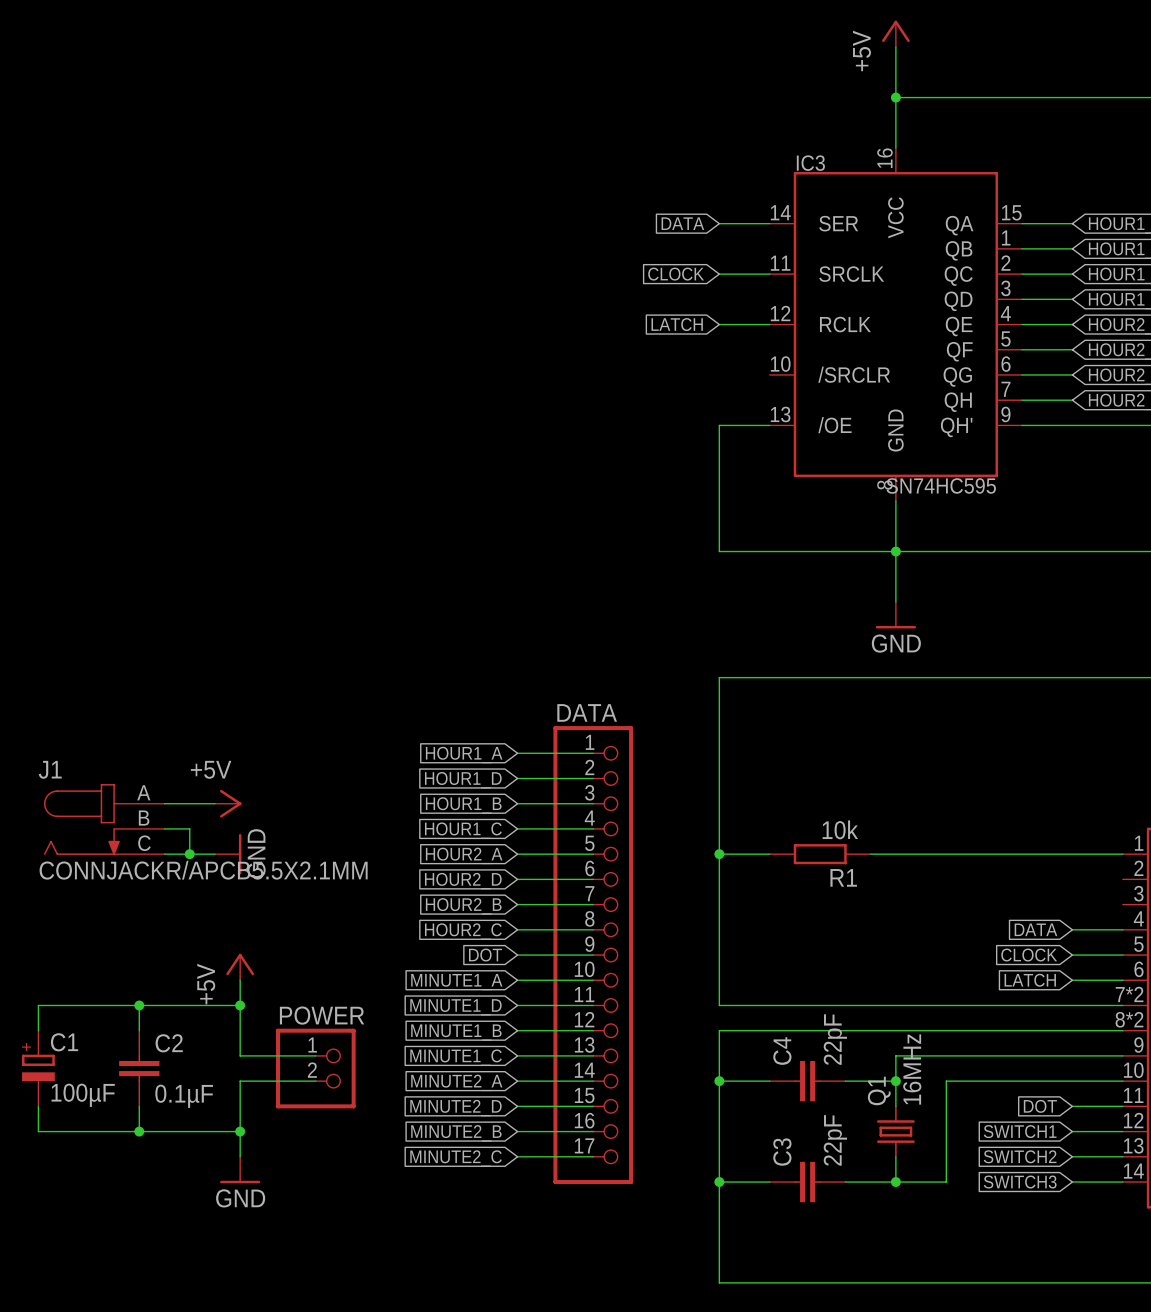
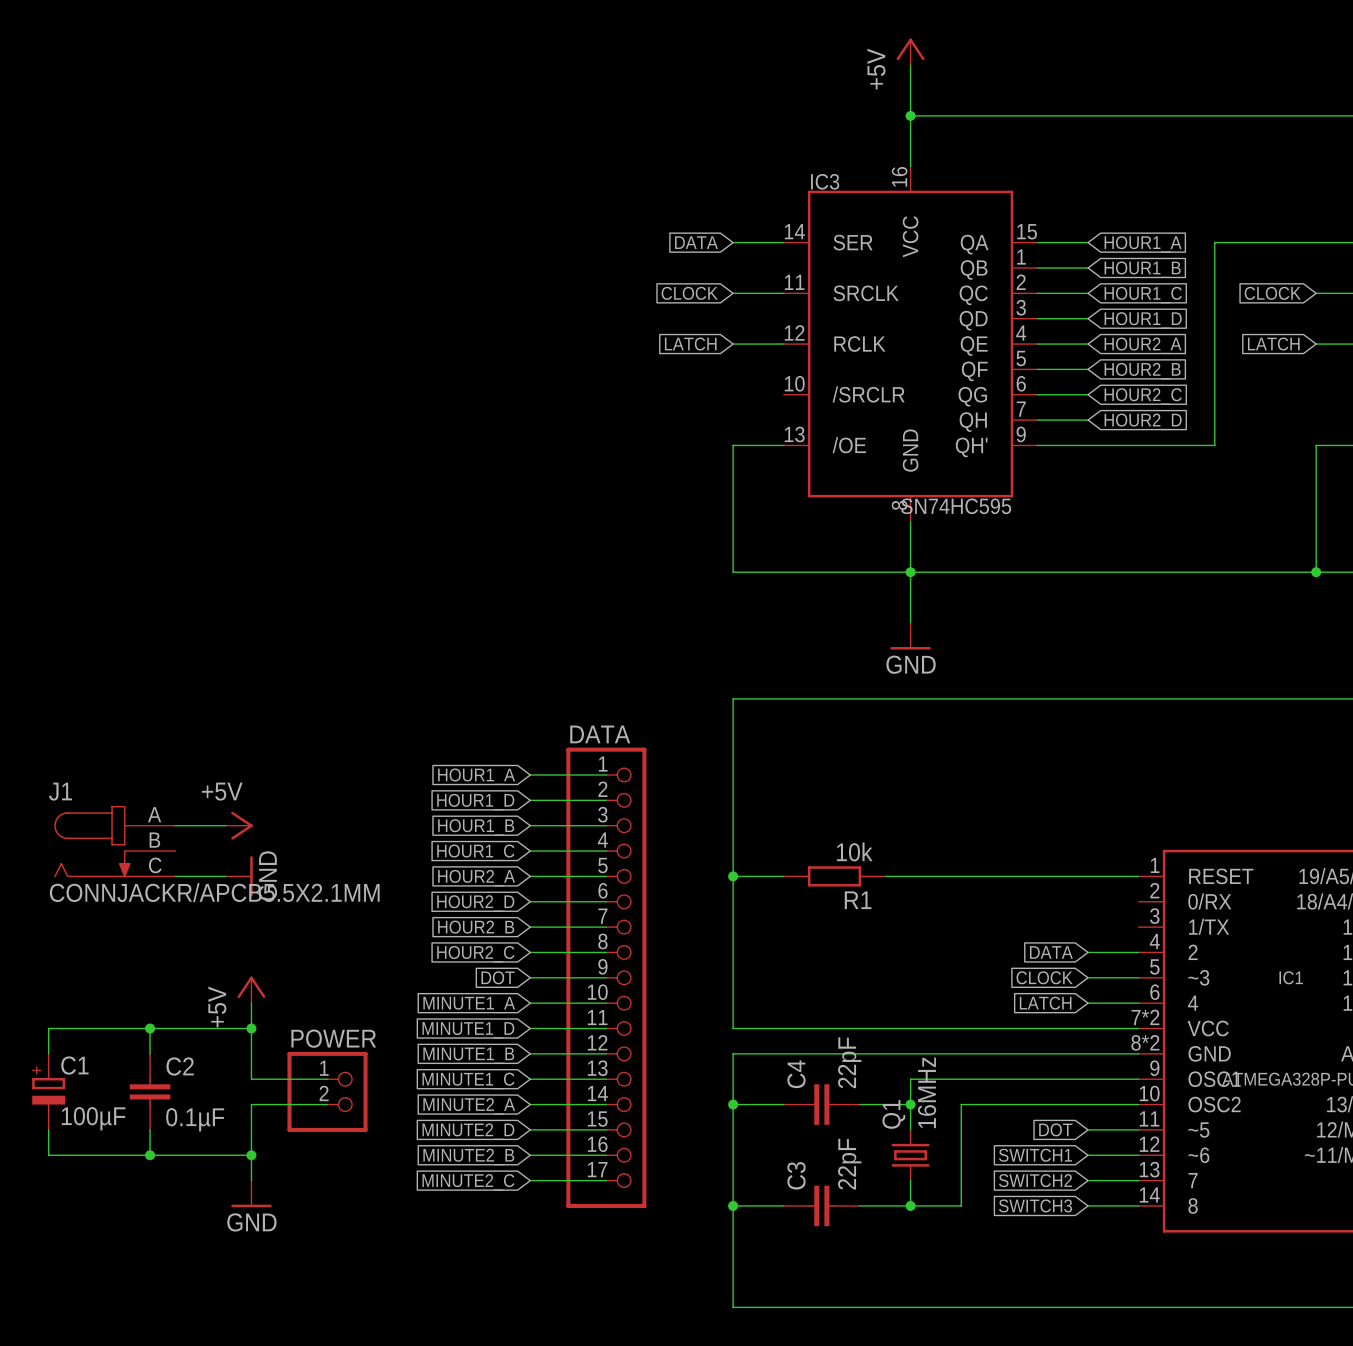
wire: (164, 828) (189, 828) (189, 854) -> none
junction: (189, 854) -> none

